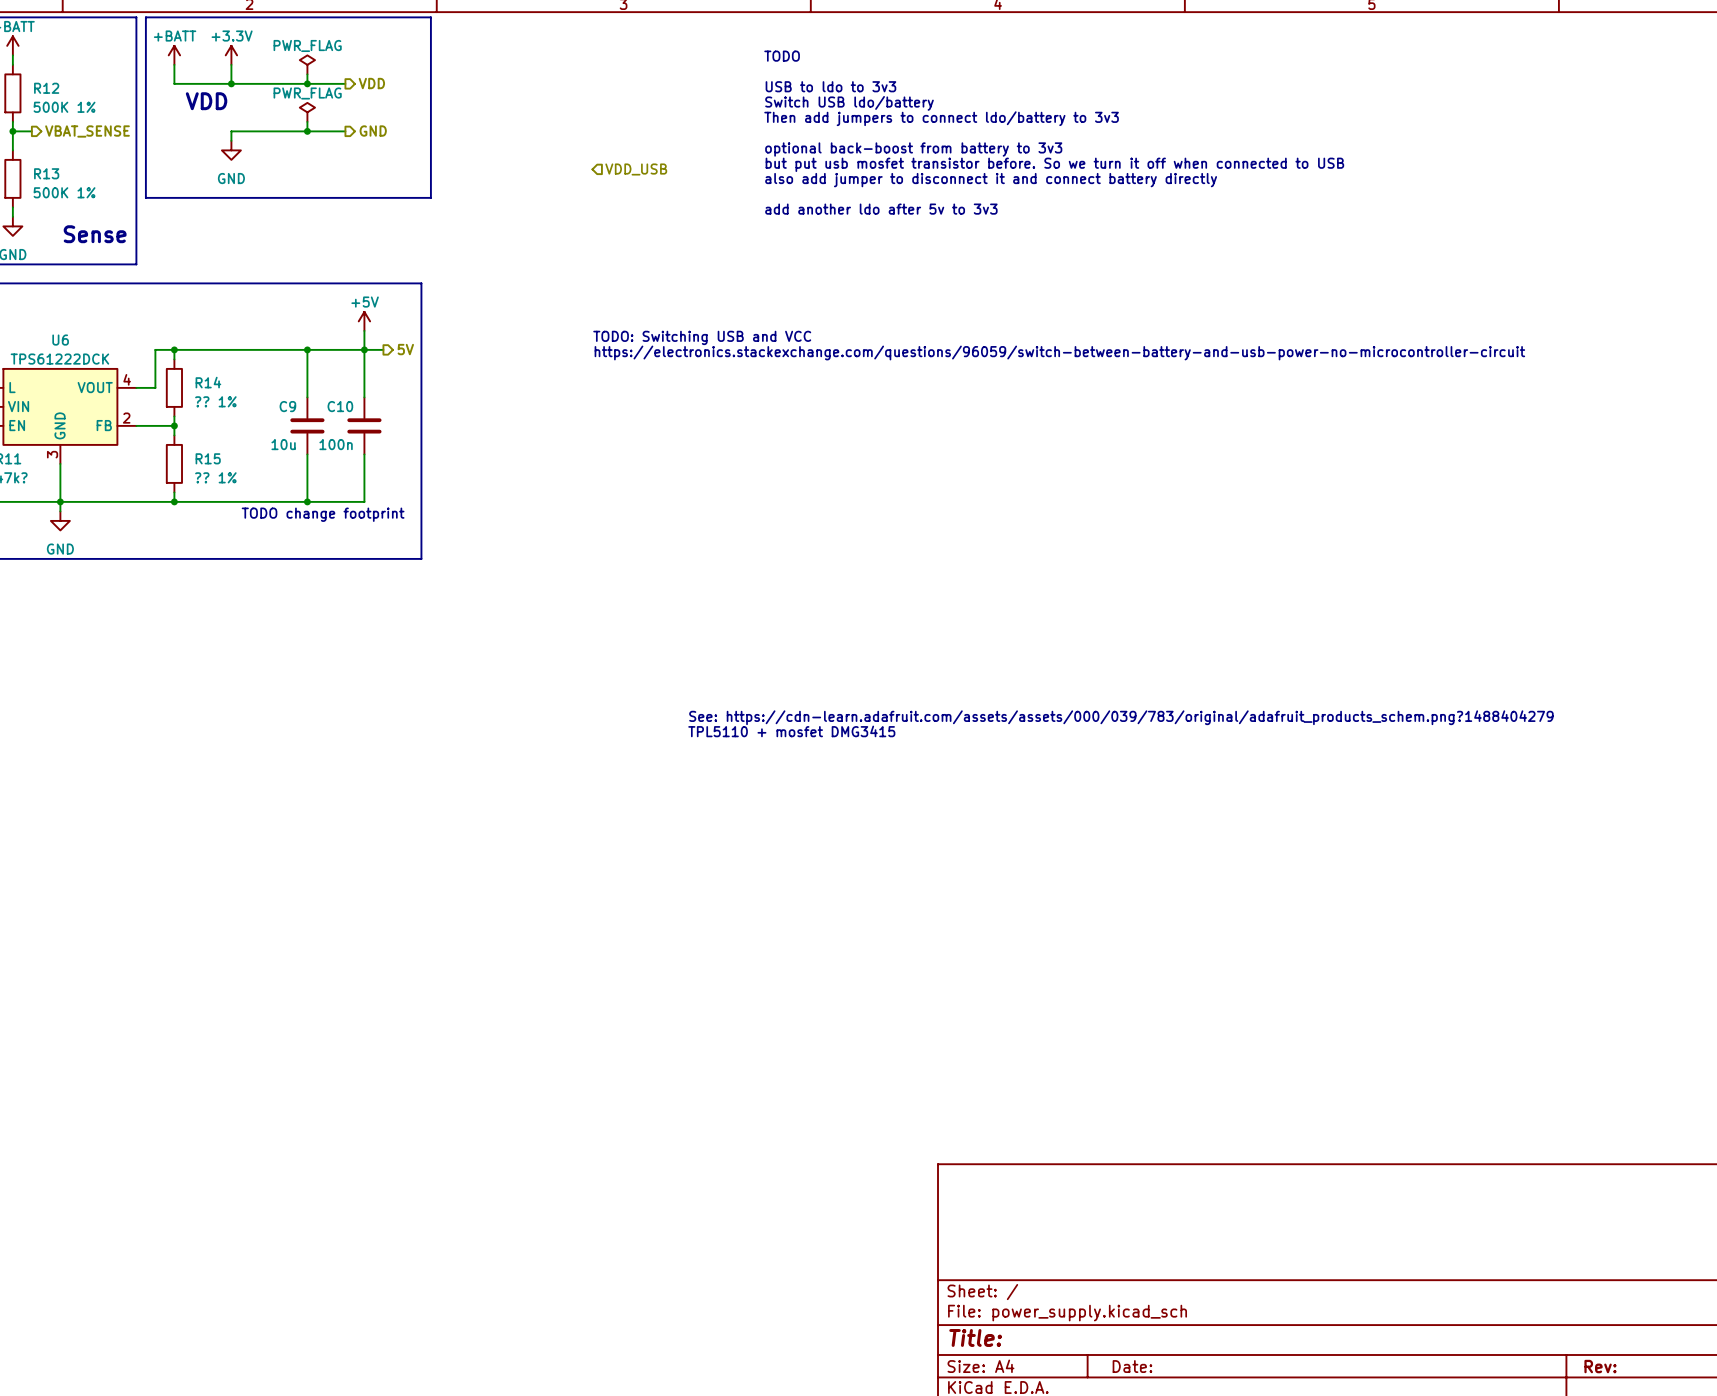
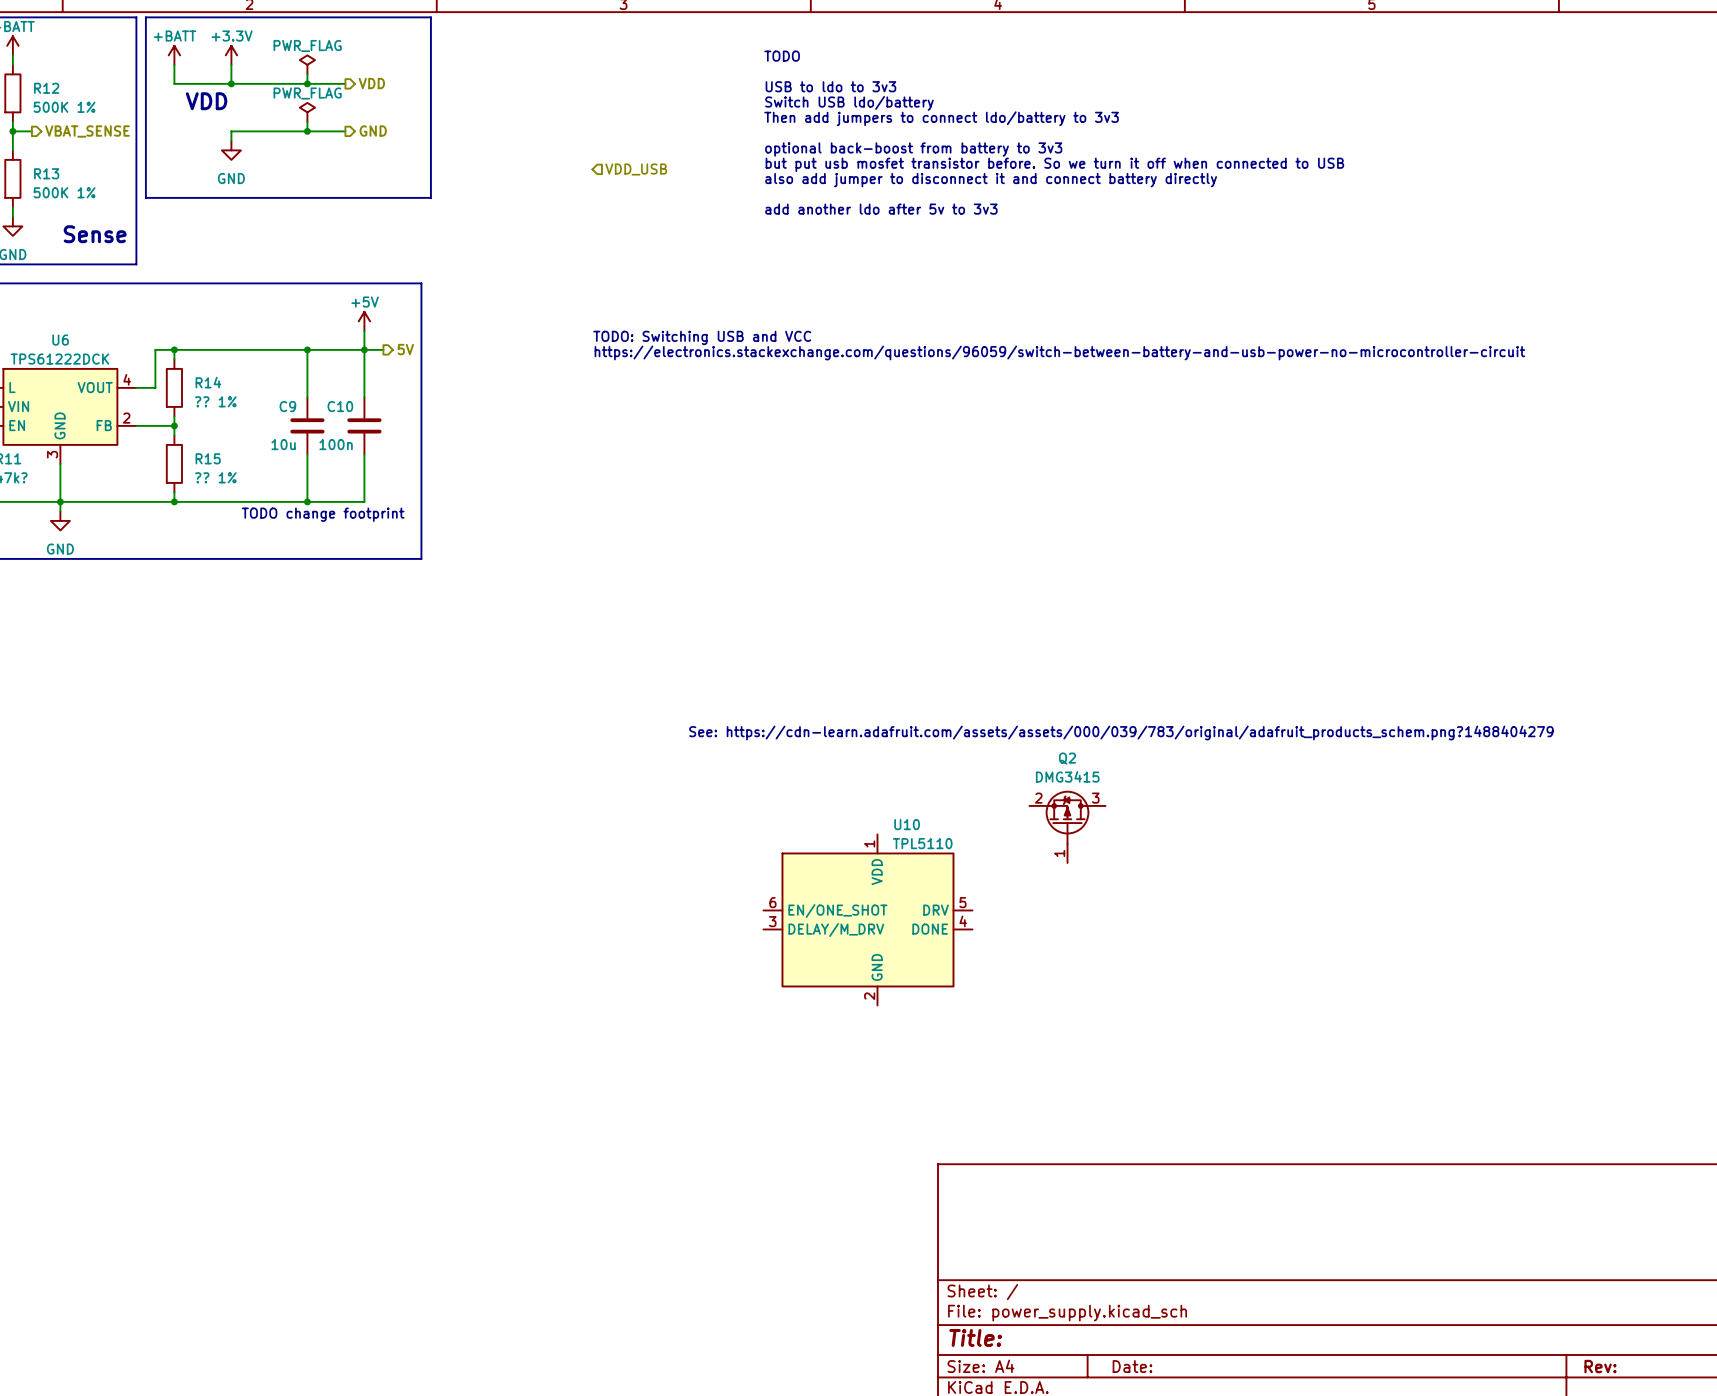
text: See: https://cdn-learn.adafruit.com/assets/assets/000/039/783/original/adafruit_products_schem.png?1488404279 (1121, 717) -> none
text: TPL5110 + mosfet DMG3415 (791, 731) -> See: https://cdn-learn.adafruit.com/assets/assets/000/039/783/original/adafruit_products_schem.png?1488404279 (1121, 733)
Q2: none -> DMG3415 (1067, 826)
U10: none -> TPL5110 (867, 919)

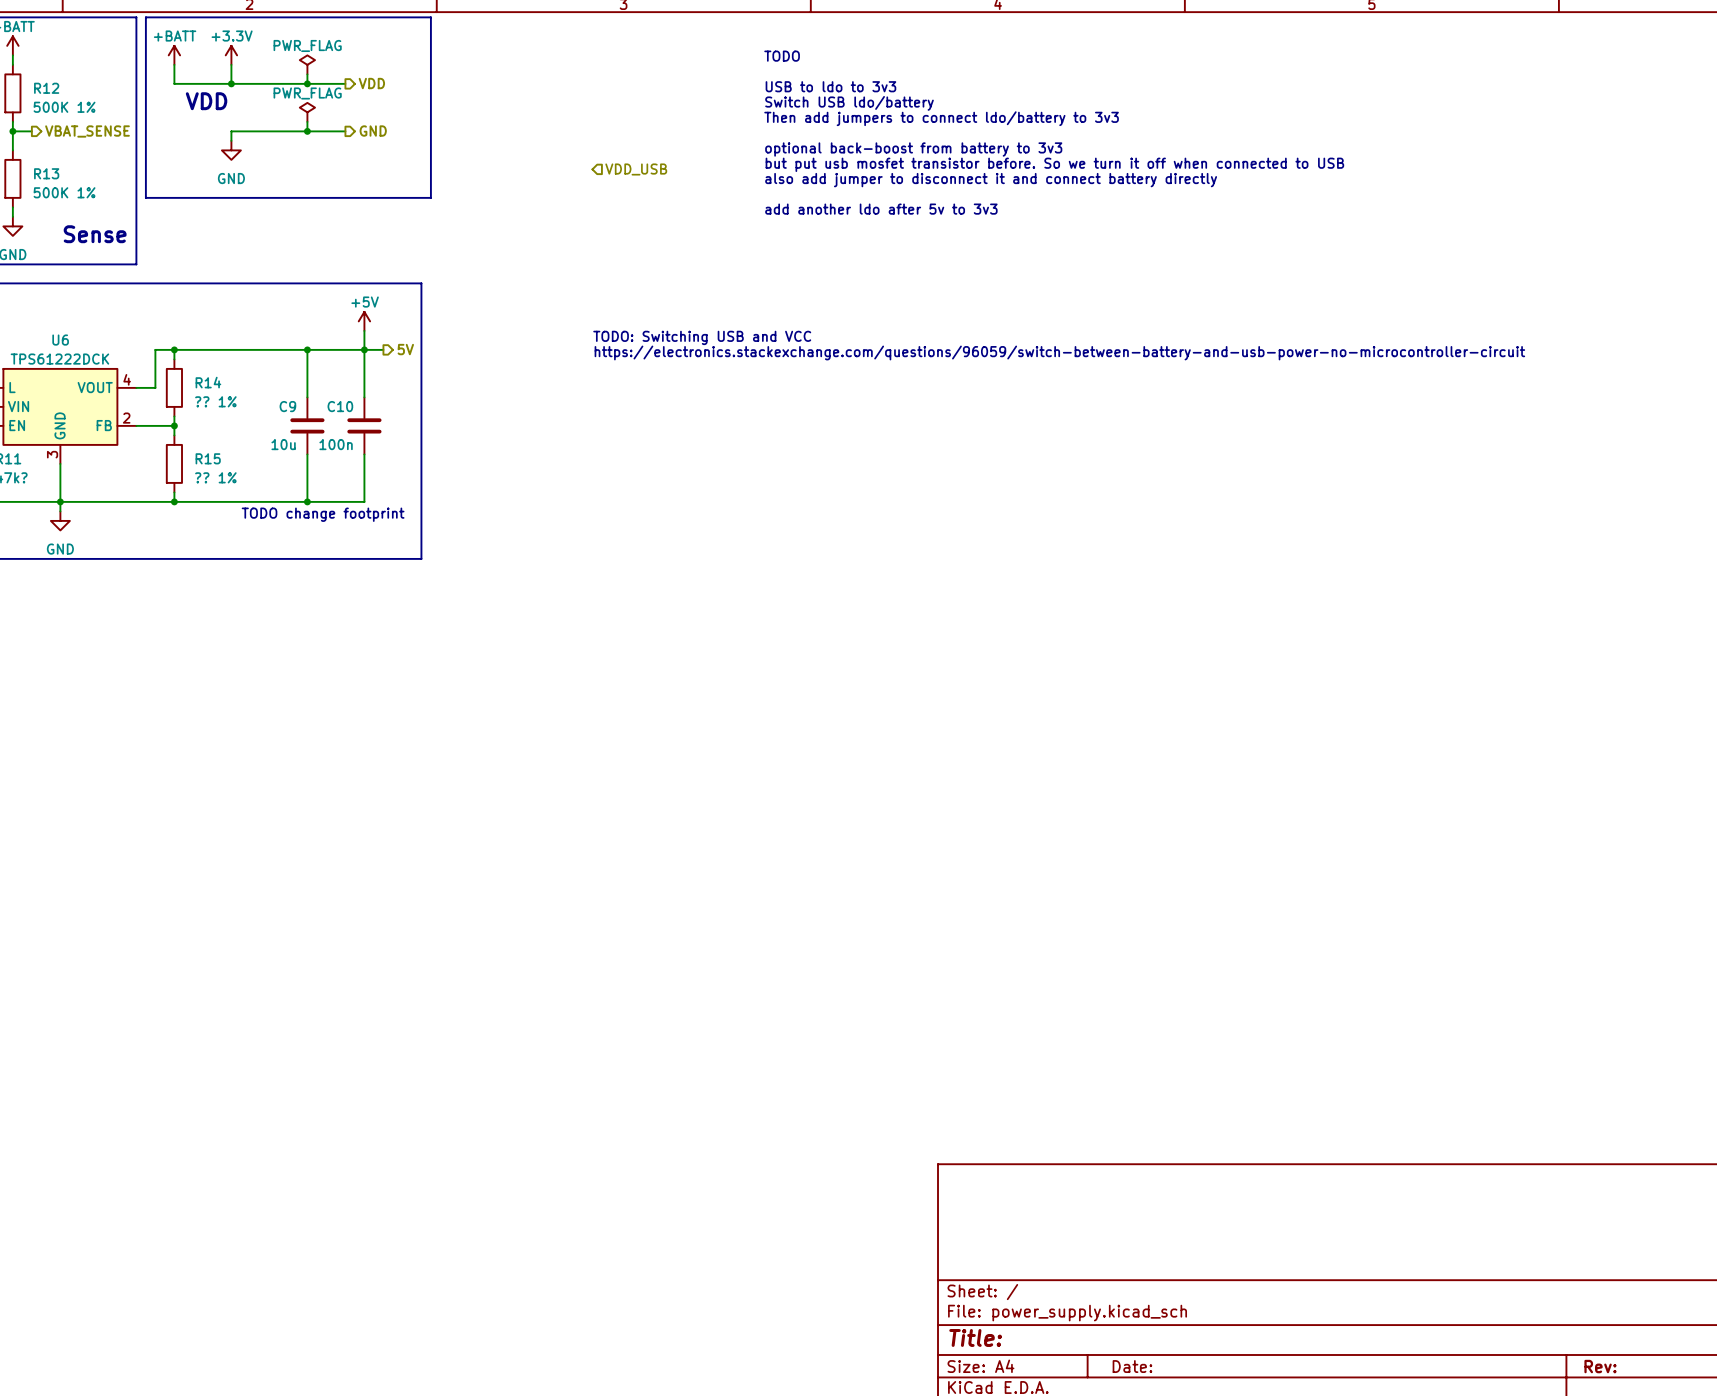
text: See: https://cdn-learn.adafruit.com/assets/assets/000/039/783/original/adafruit_products_schem.png?1488404279 (1121, 733) -> none
Q2: DMG3415 (1067, 826) -> none
U10: TPL5110 (867, 919) -> none

